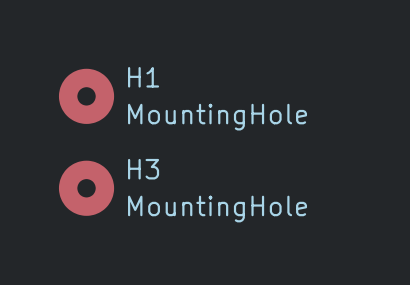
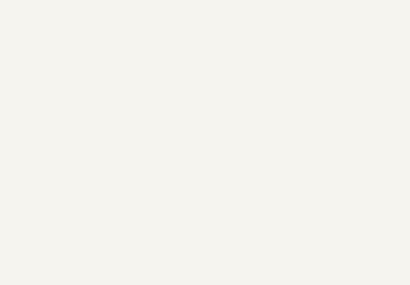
H1: MountingHole (86, 96) -> none
H3: MountingHole (86, 188) -> none

